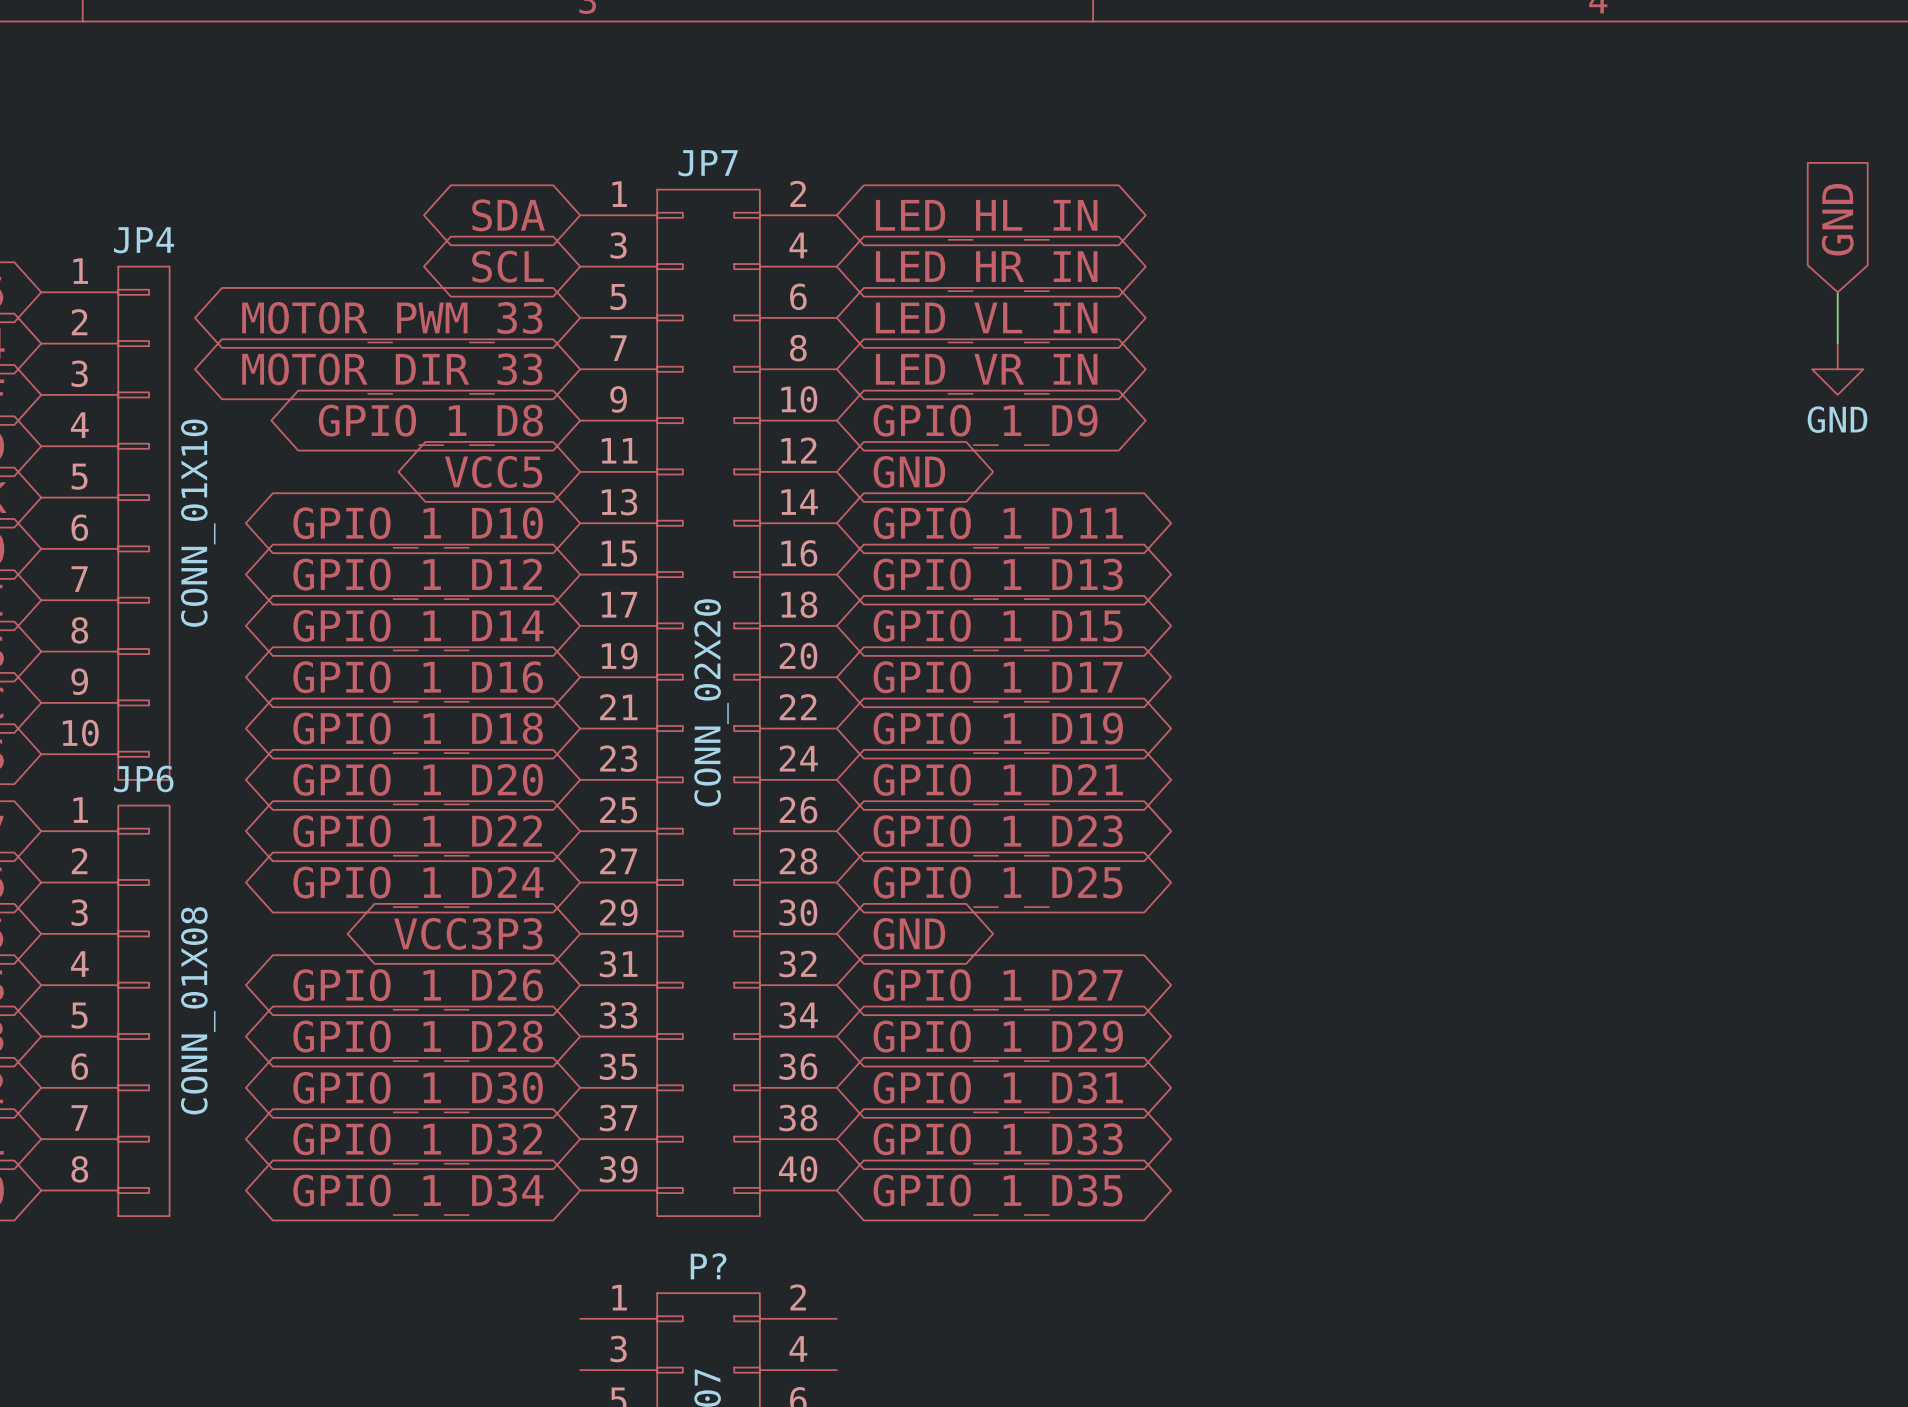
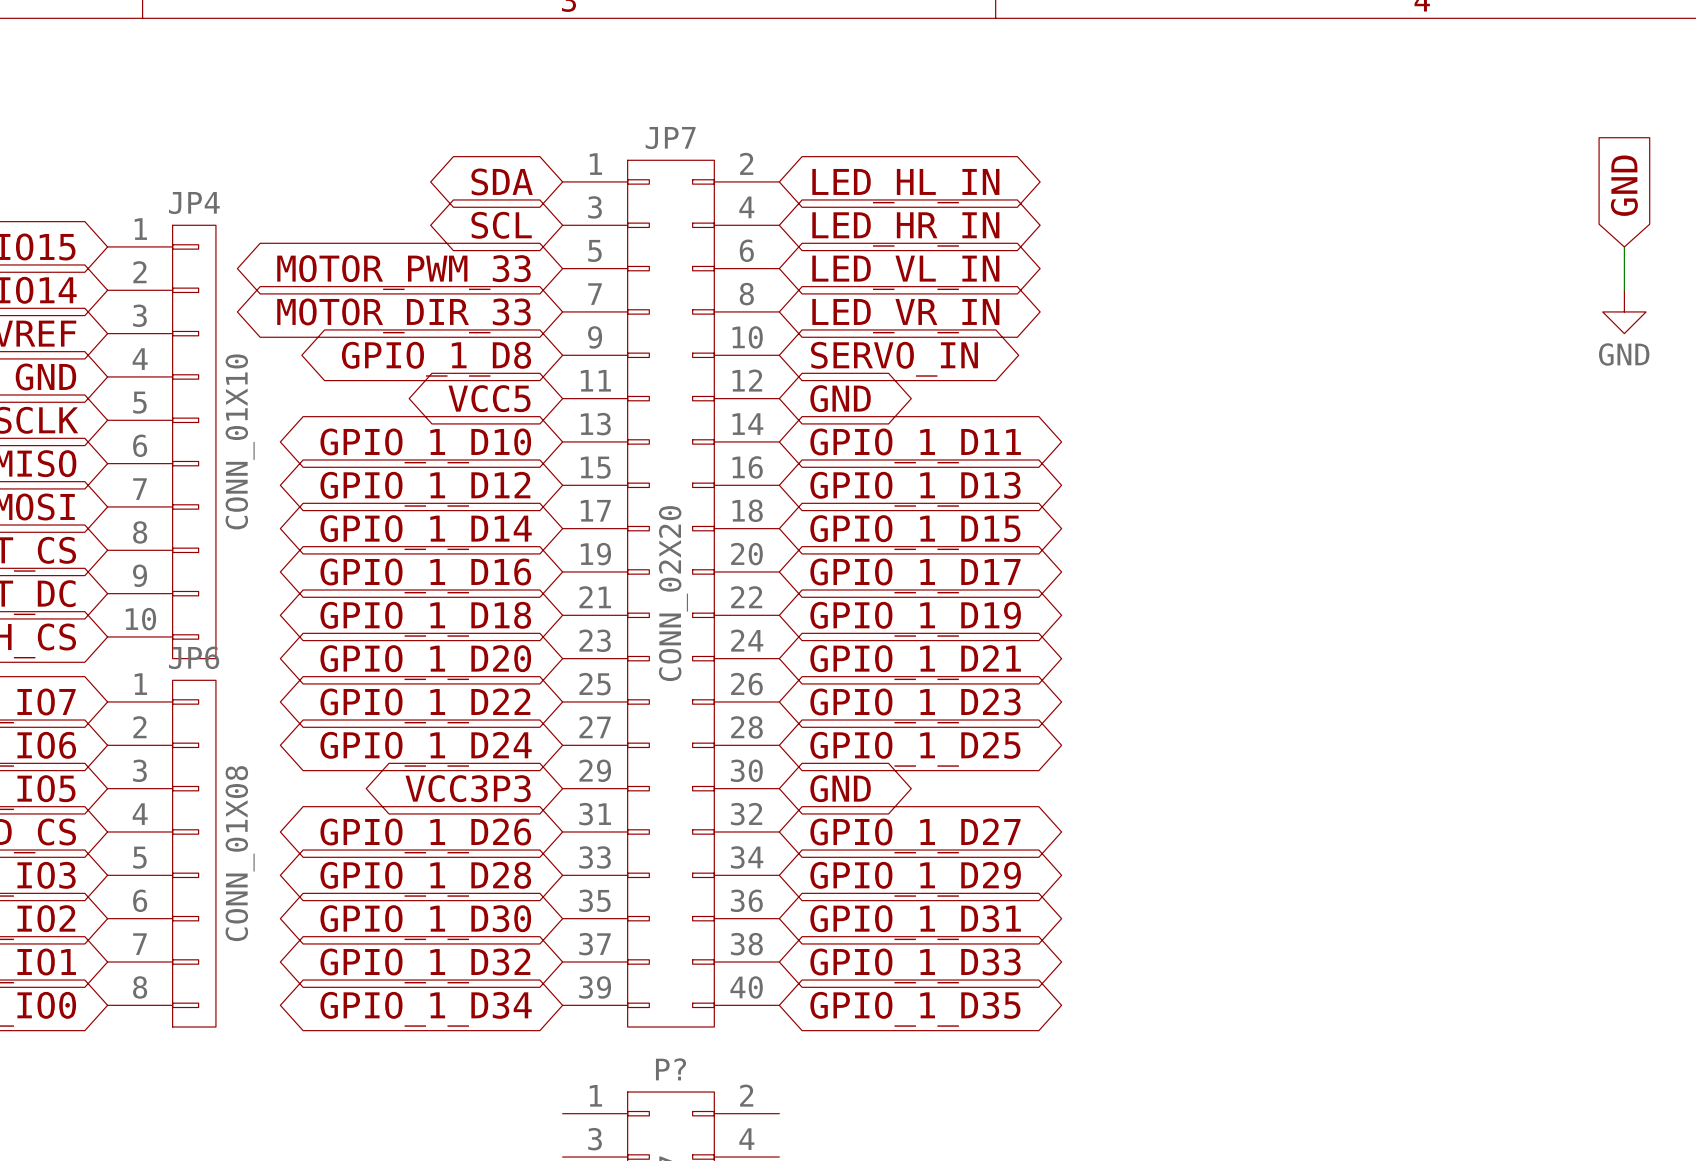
global label: GPIO_1_D9 (985, 425) -> SERVO_IN (894, 359)

